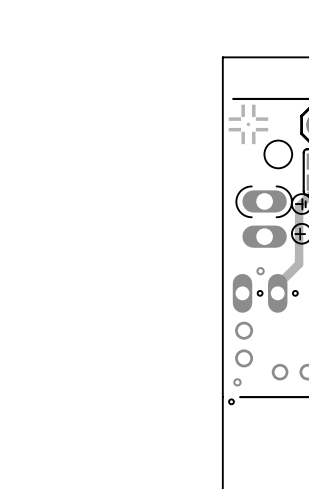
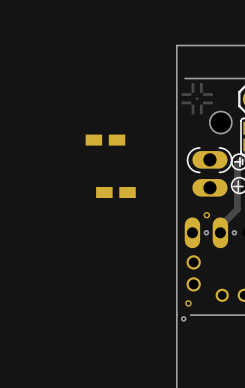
part: none -> (105, 140)
part: none -> (115, 192)

